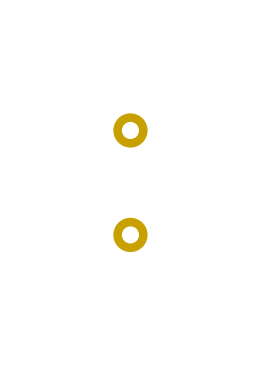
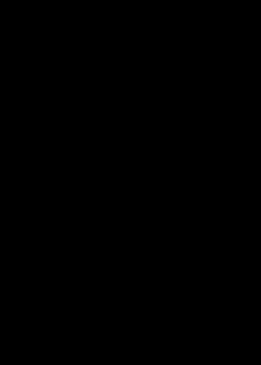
part: (130, 130) -> none
part: (130, 234) -> none

